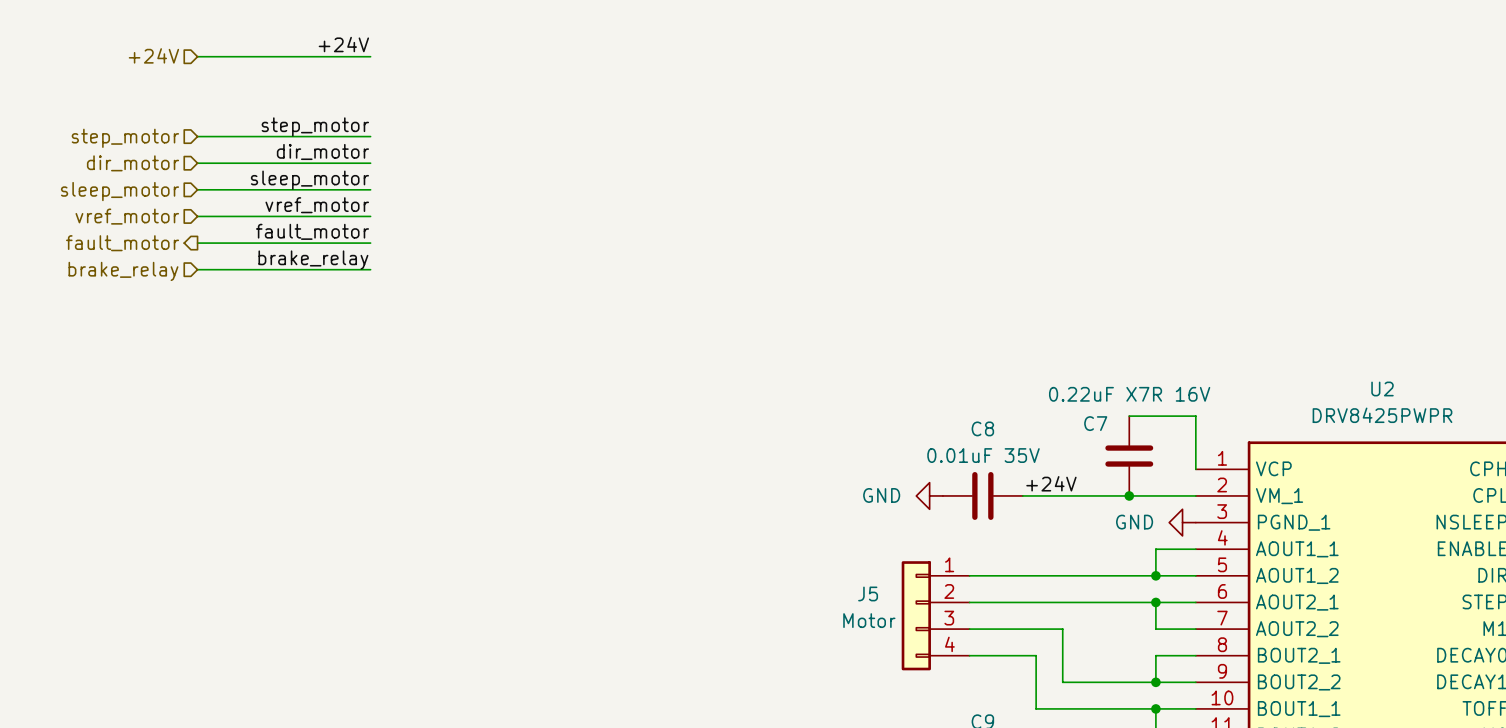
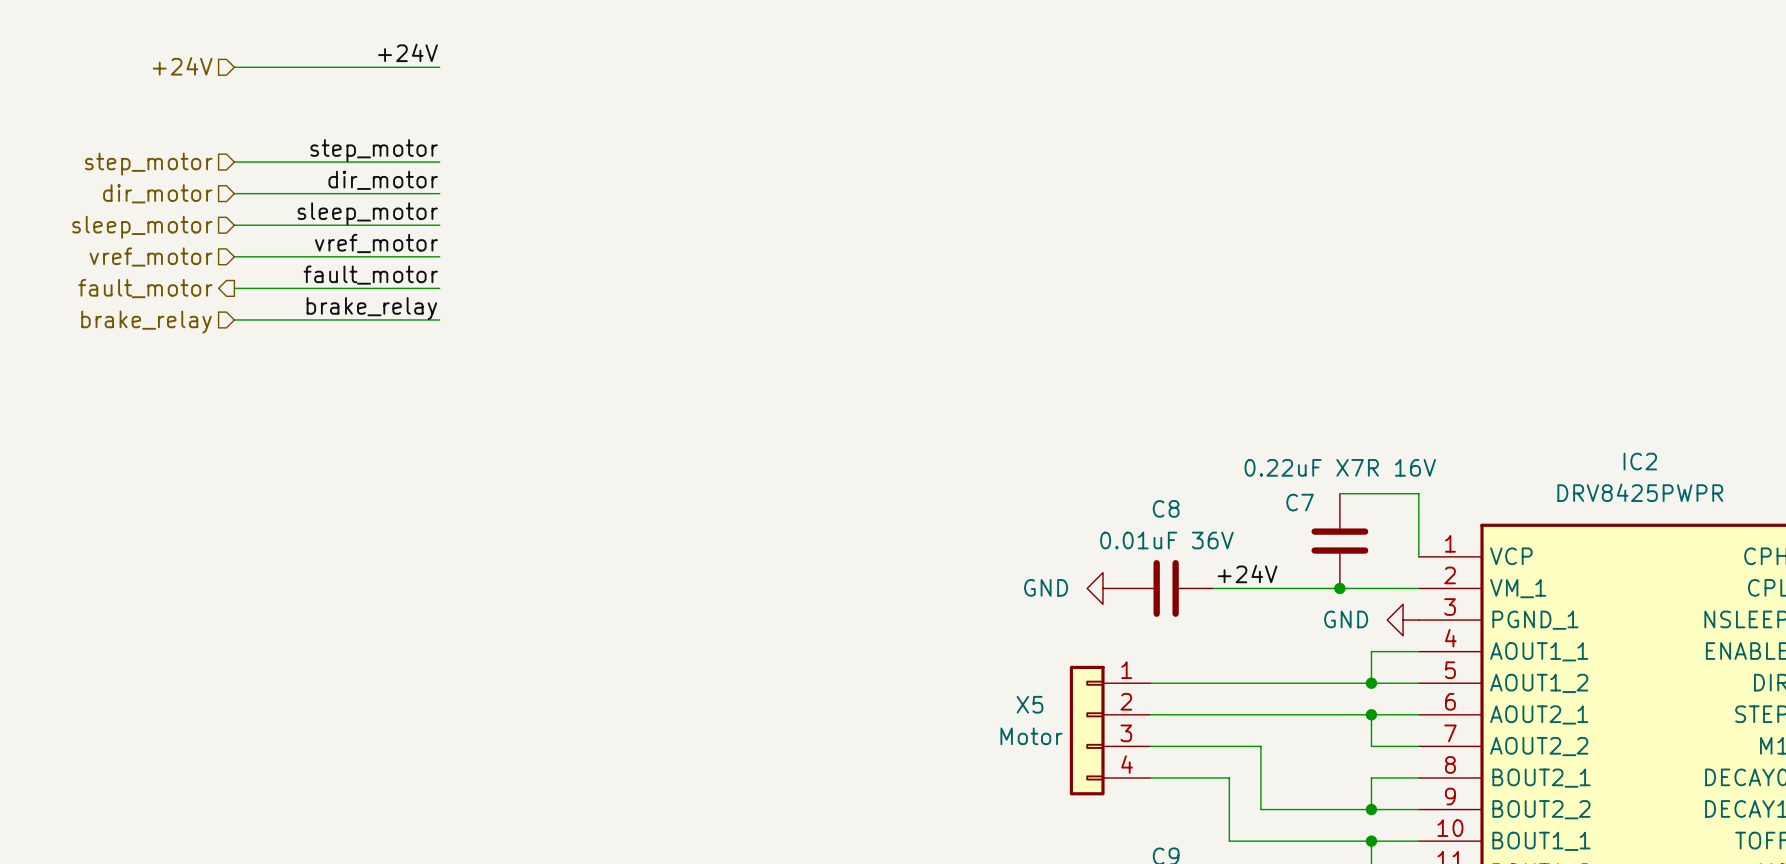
U2 name: U2 (1382, 388) -> IC2 (1640, 461)
C8 value: 0.01uF 35V (983, 455) -> 0.01uF 36V (1166, 540)
J5 name: J5 (868, 593) -> X5 (1029, 704)

